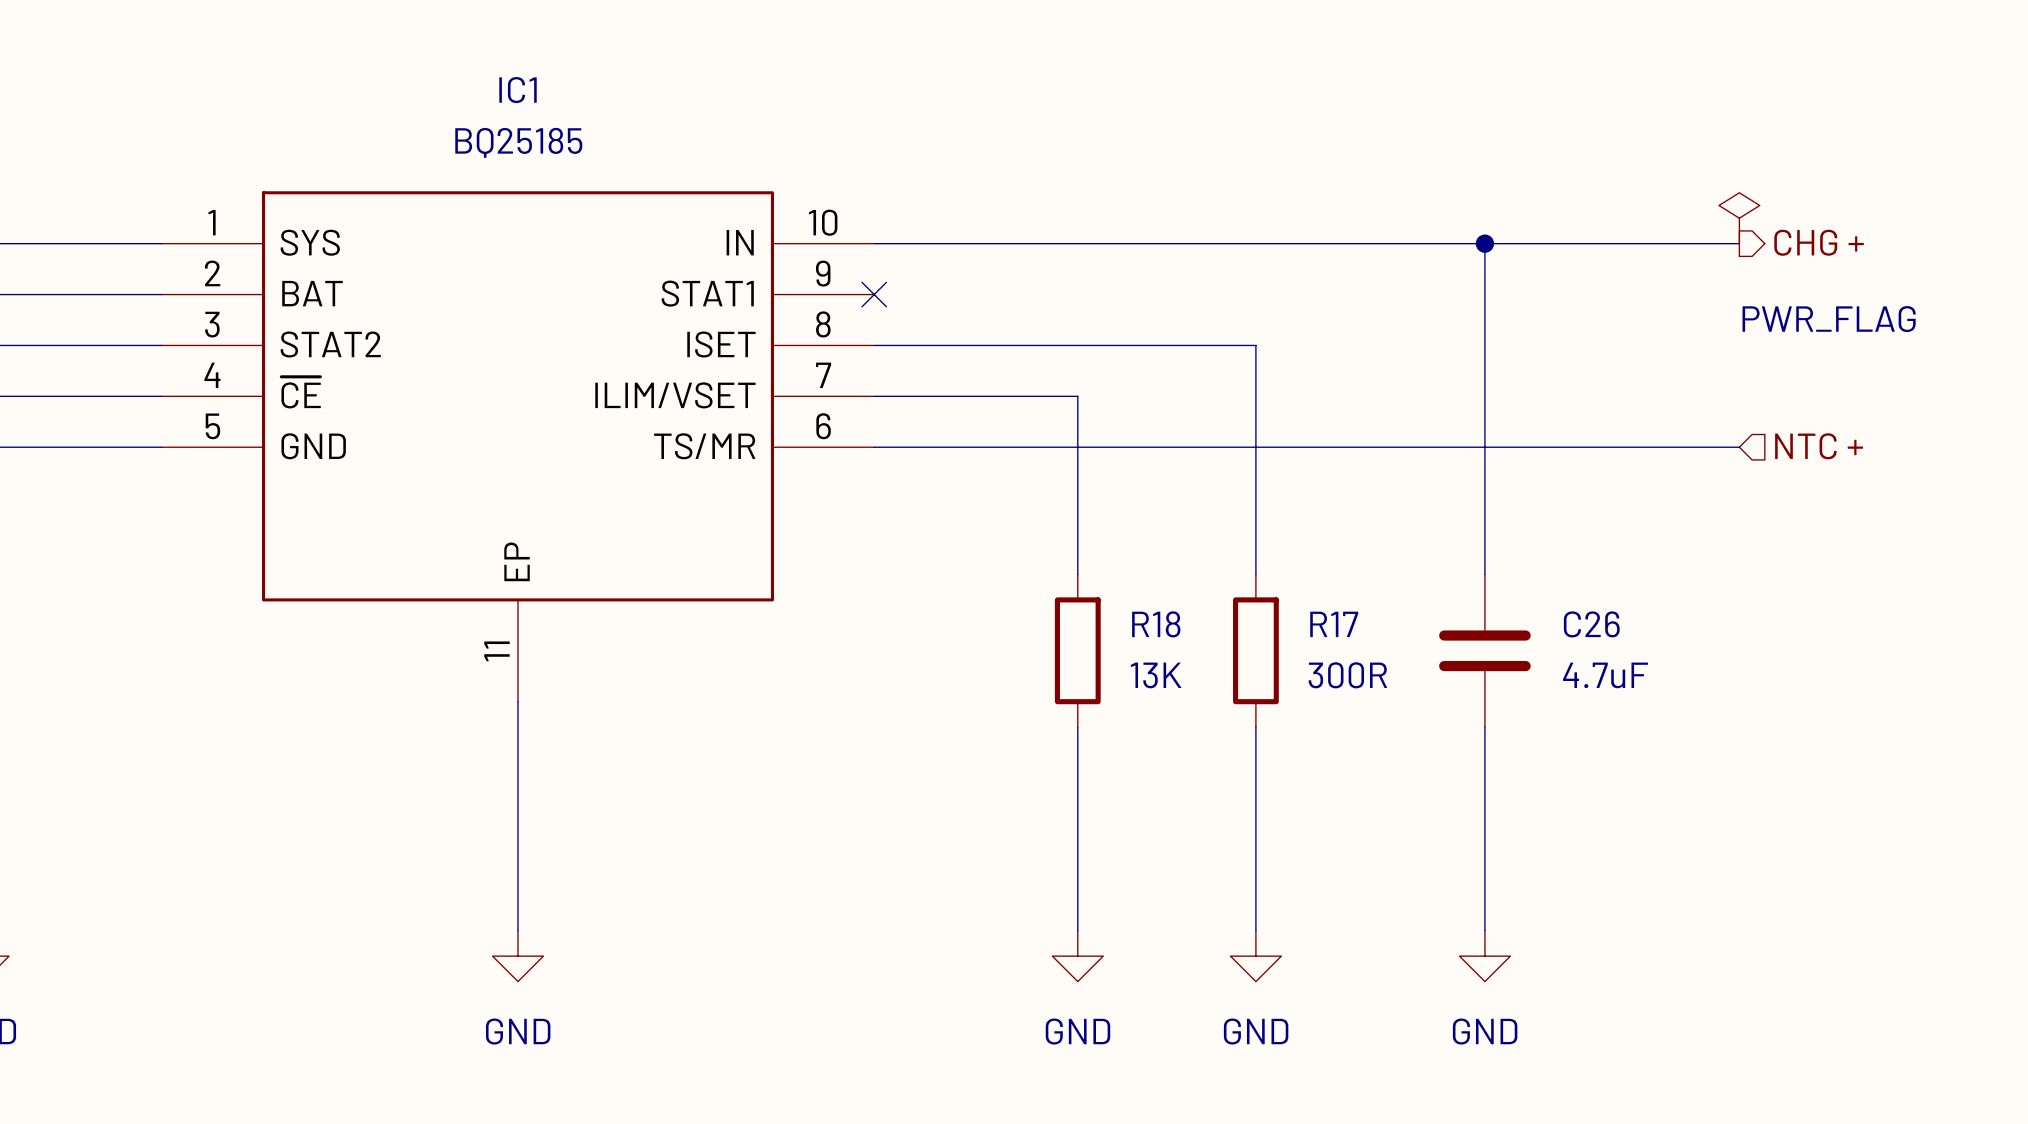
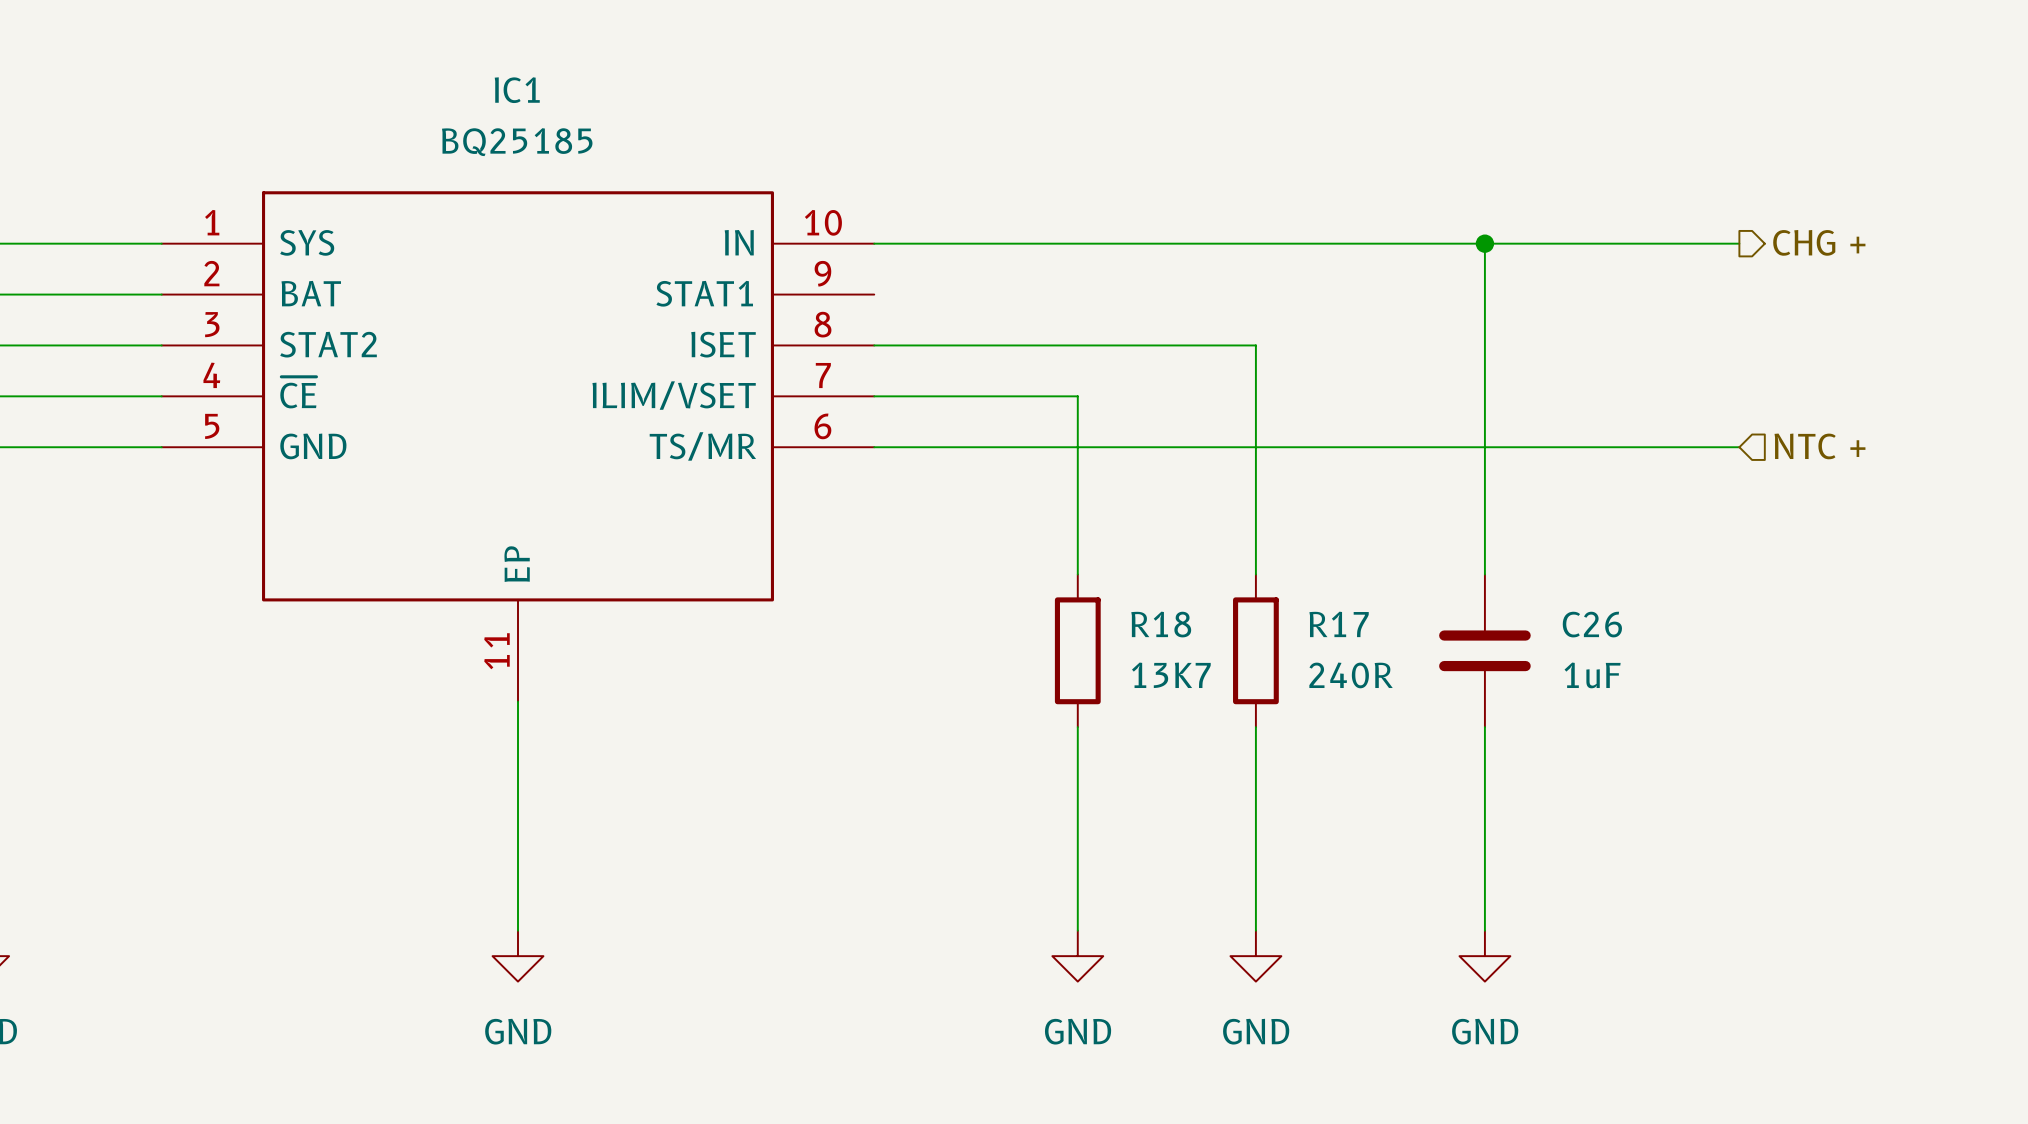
power symbol: PWR_FLAG (1739, 218) -> none
no-connect mark: (874, 294) -> none
R18 value: 13K (1156, 675) -> 13K7 (1171, 675)
R17 value: 300R (1347, 675) -> 240R (1351, 675)
C26 value: 4.7uF (1605, 675) -> 1uF (1592, 675)

